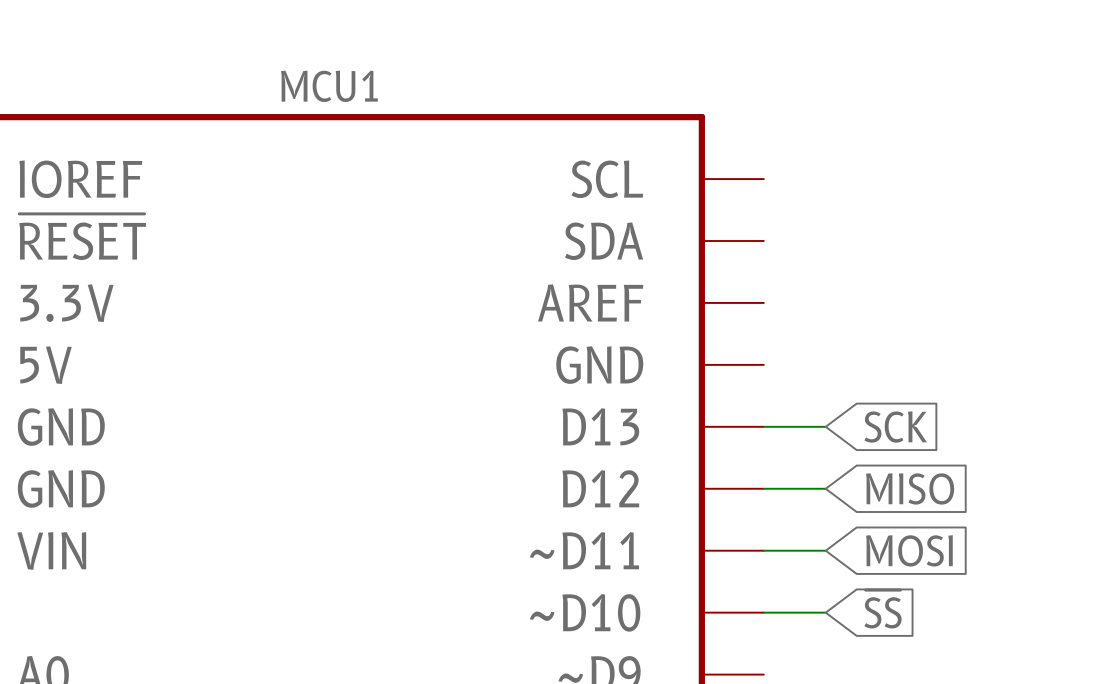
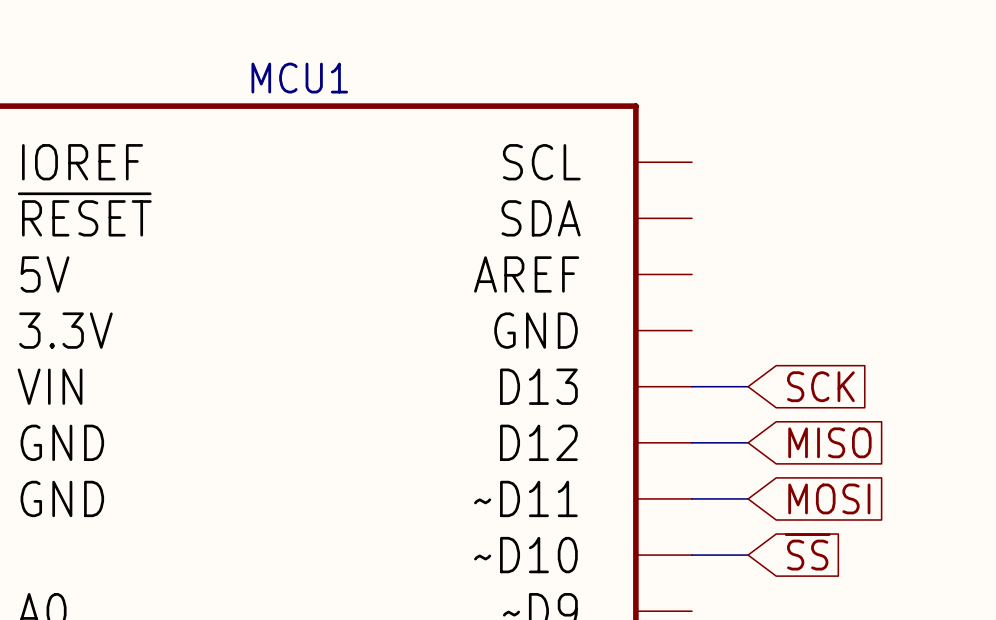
MCU1 pin name: 3.3V (66, 303) -> 5V (45, 274)
MCU1 pin name: 5V (46, 365) -> 3.3V (65, 330)
MCU1 pin name: GND (61, 427) -> VIN (50, 386)
MCU1 pin name: VIN (51, 550) -> GND (62, 498)

